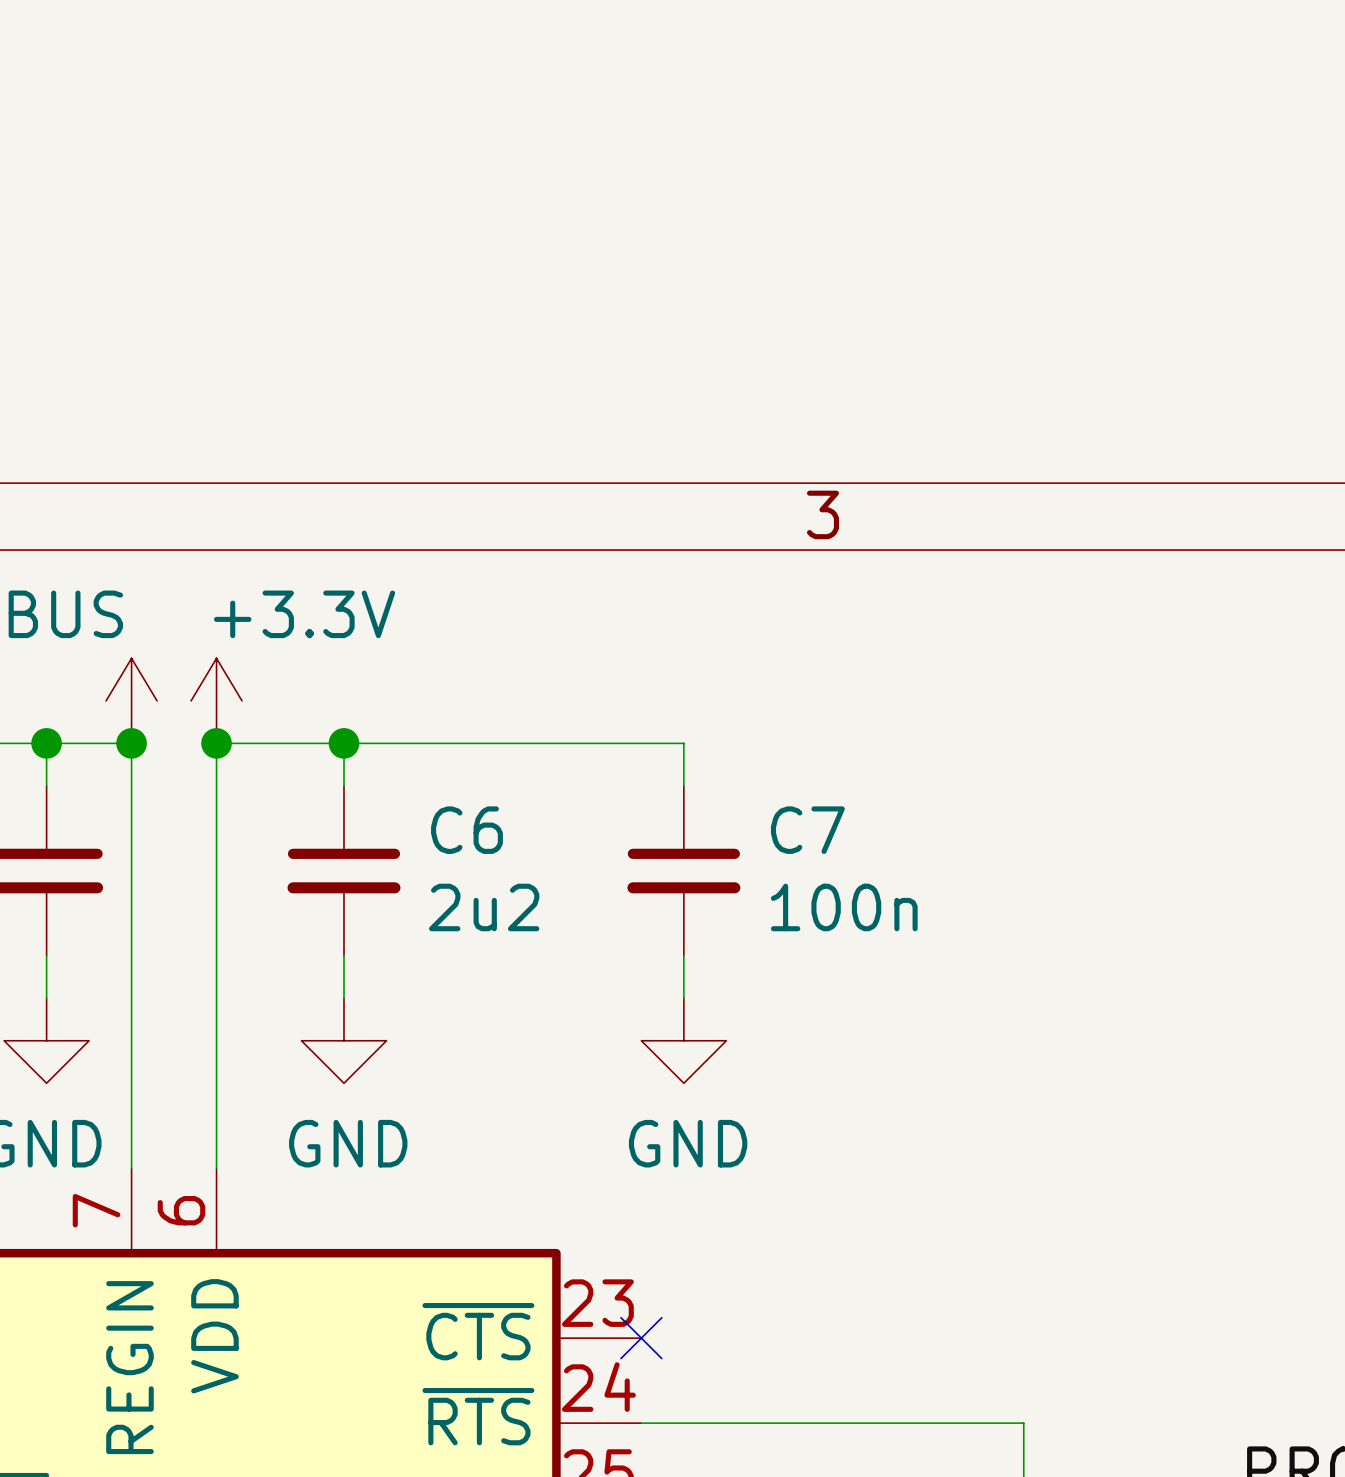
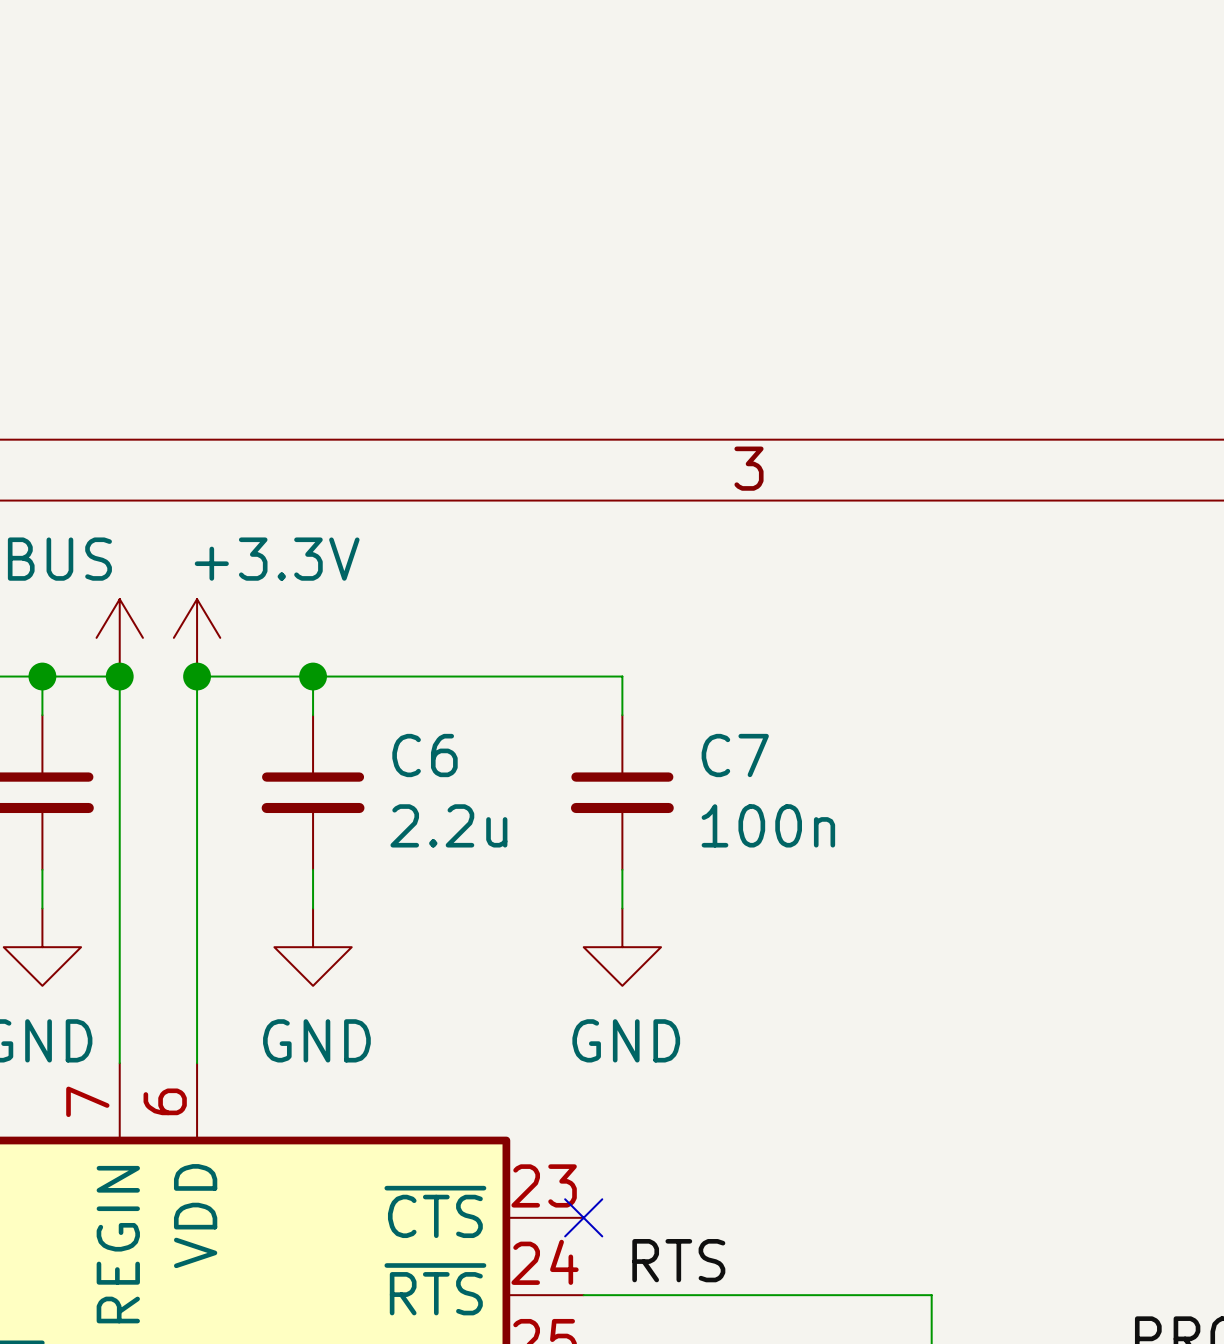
C6 value: 2u2 (484, 907) -> 2.2u (448, 825)
label: none -> RTS (678, 1260)

